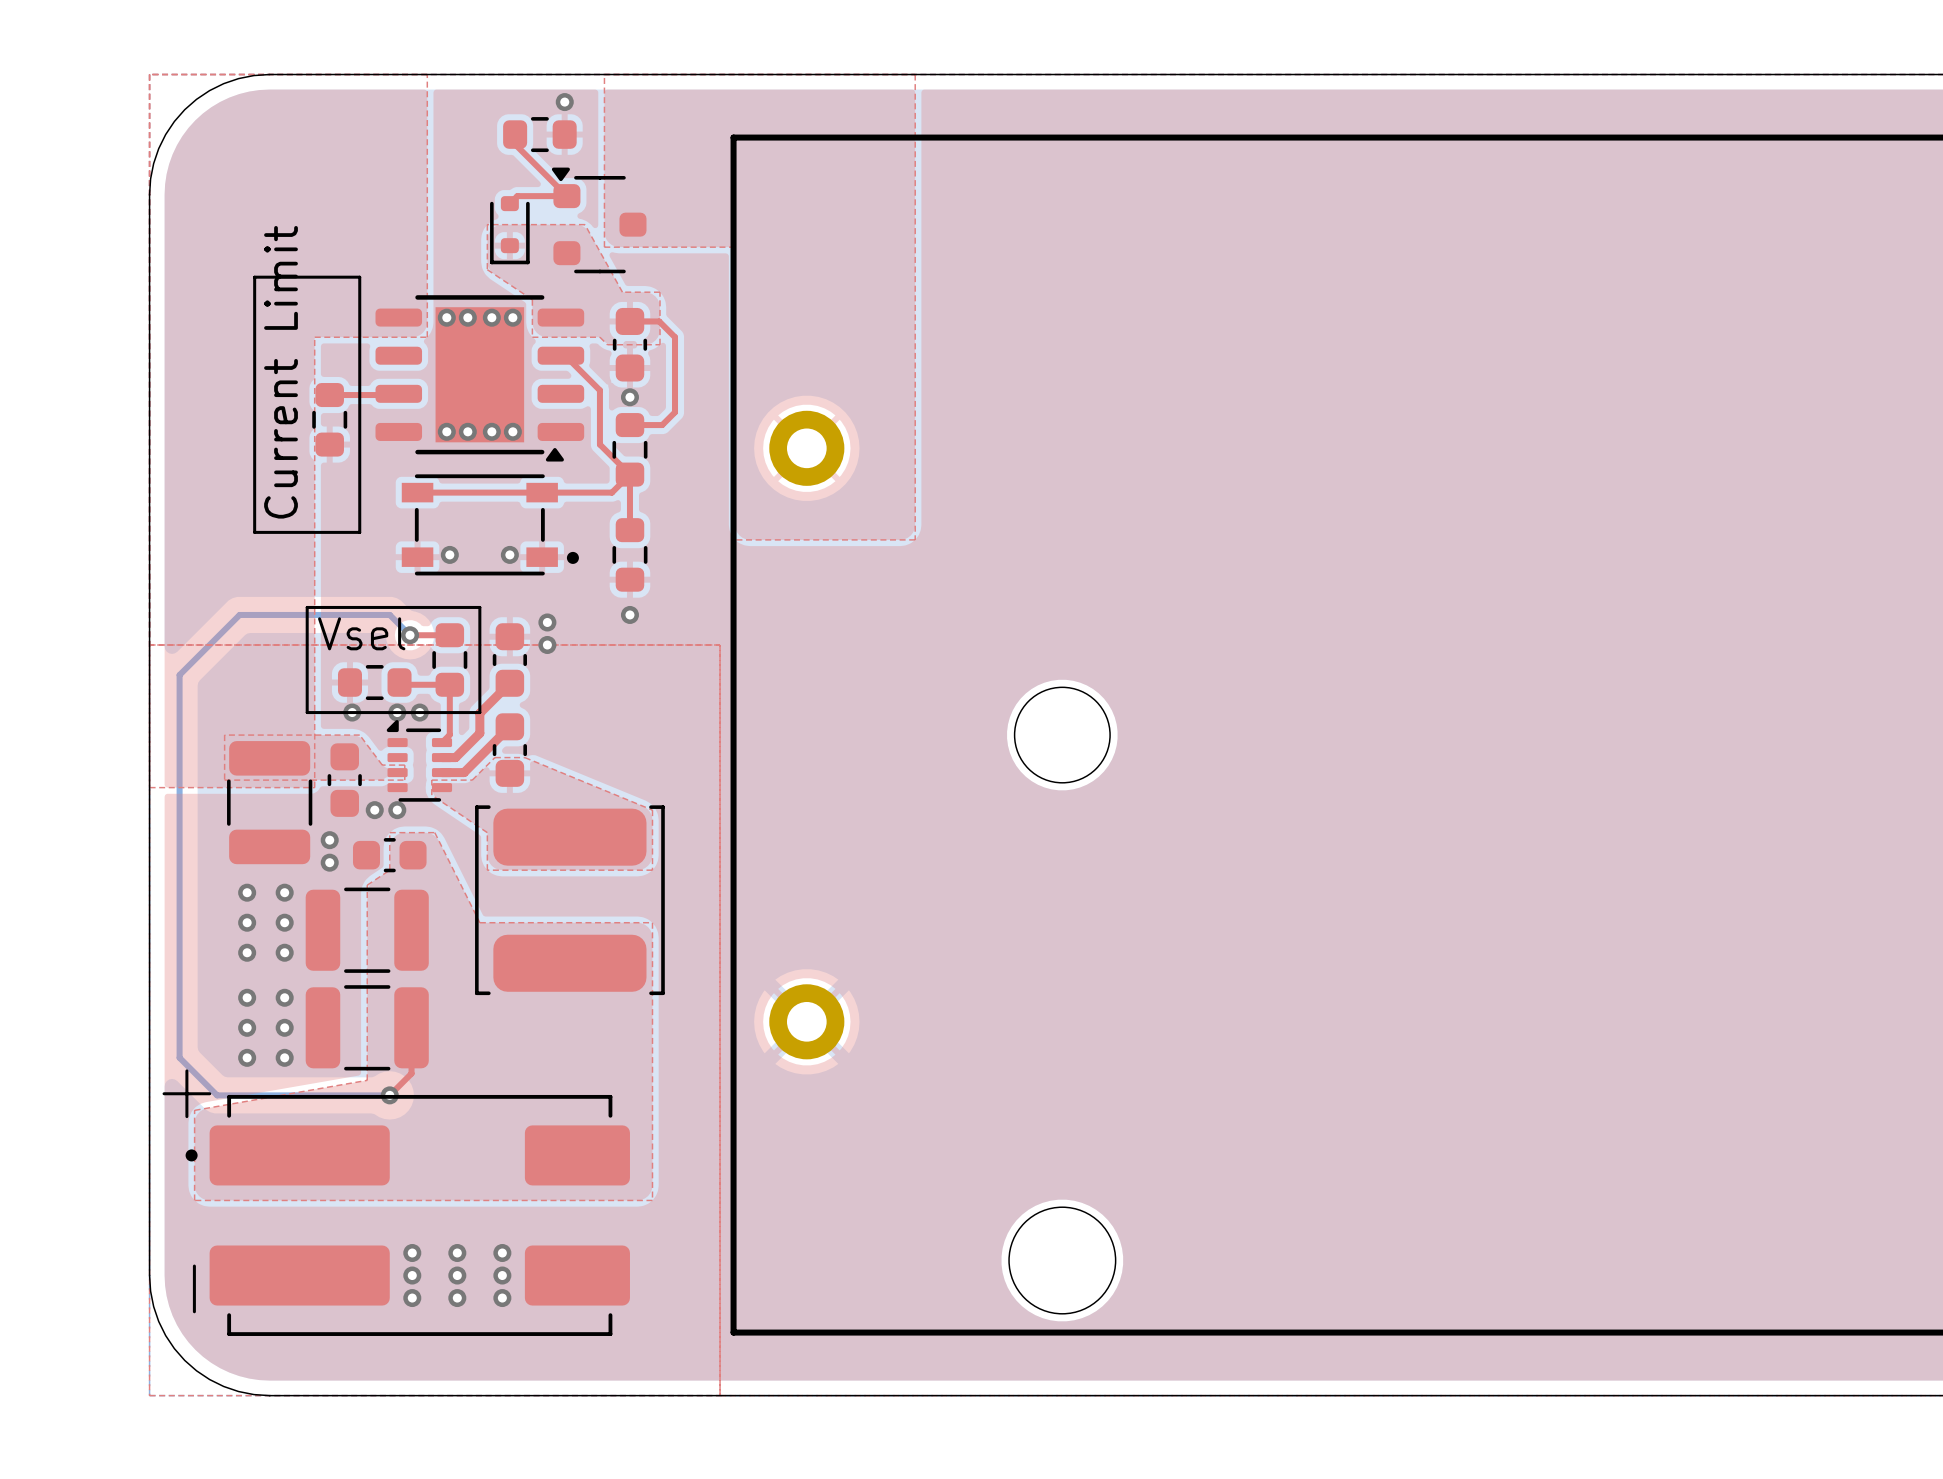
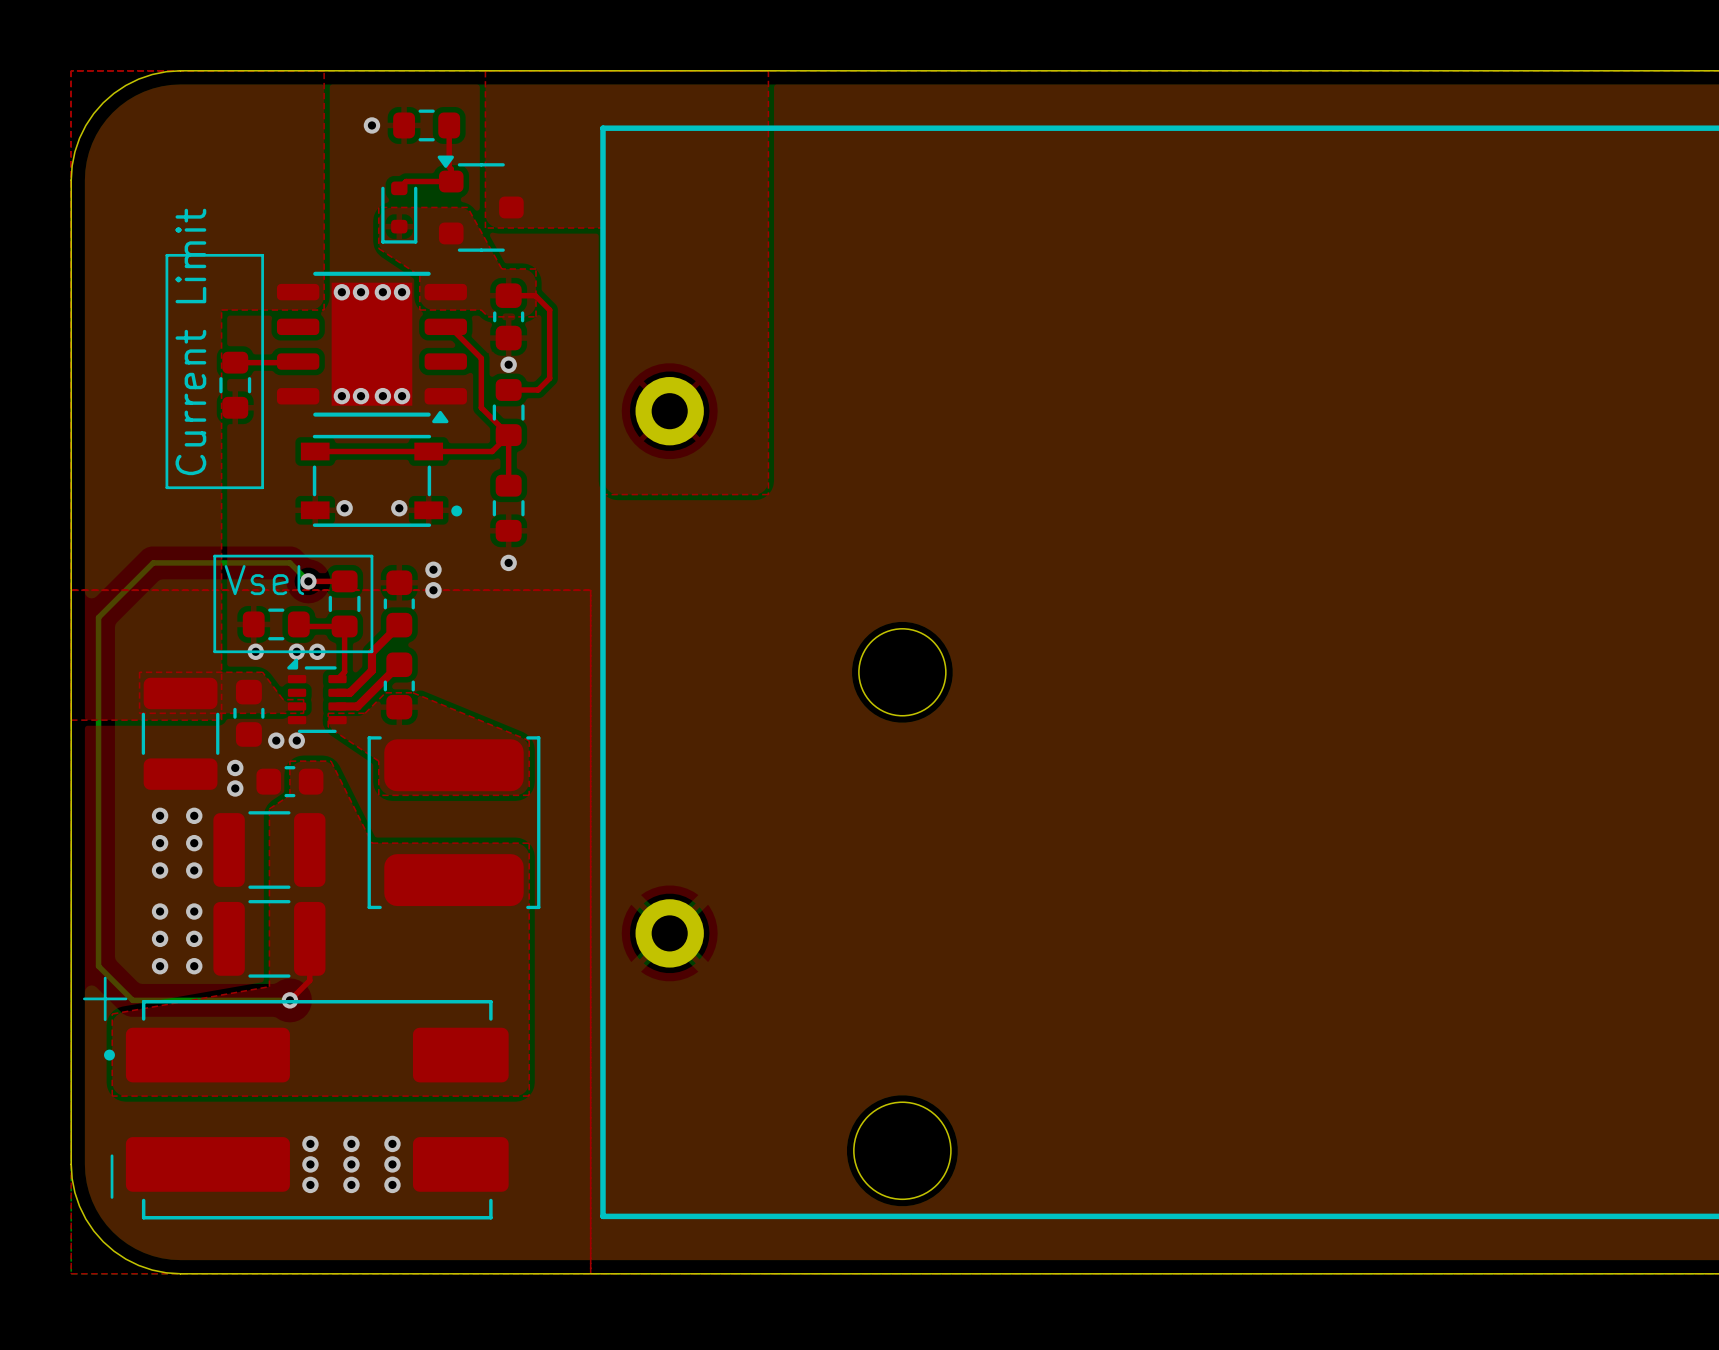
via position: (564, 102) -> (371, 125)
top track: (515, 134) (515, 144) (566, 196) -> (449, 125) (449, 167) (451, 169) (451, 181)

